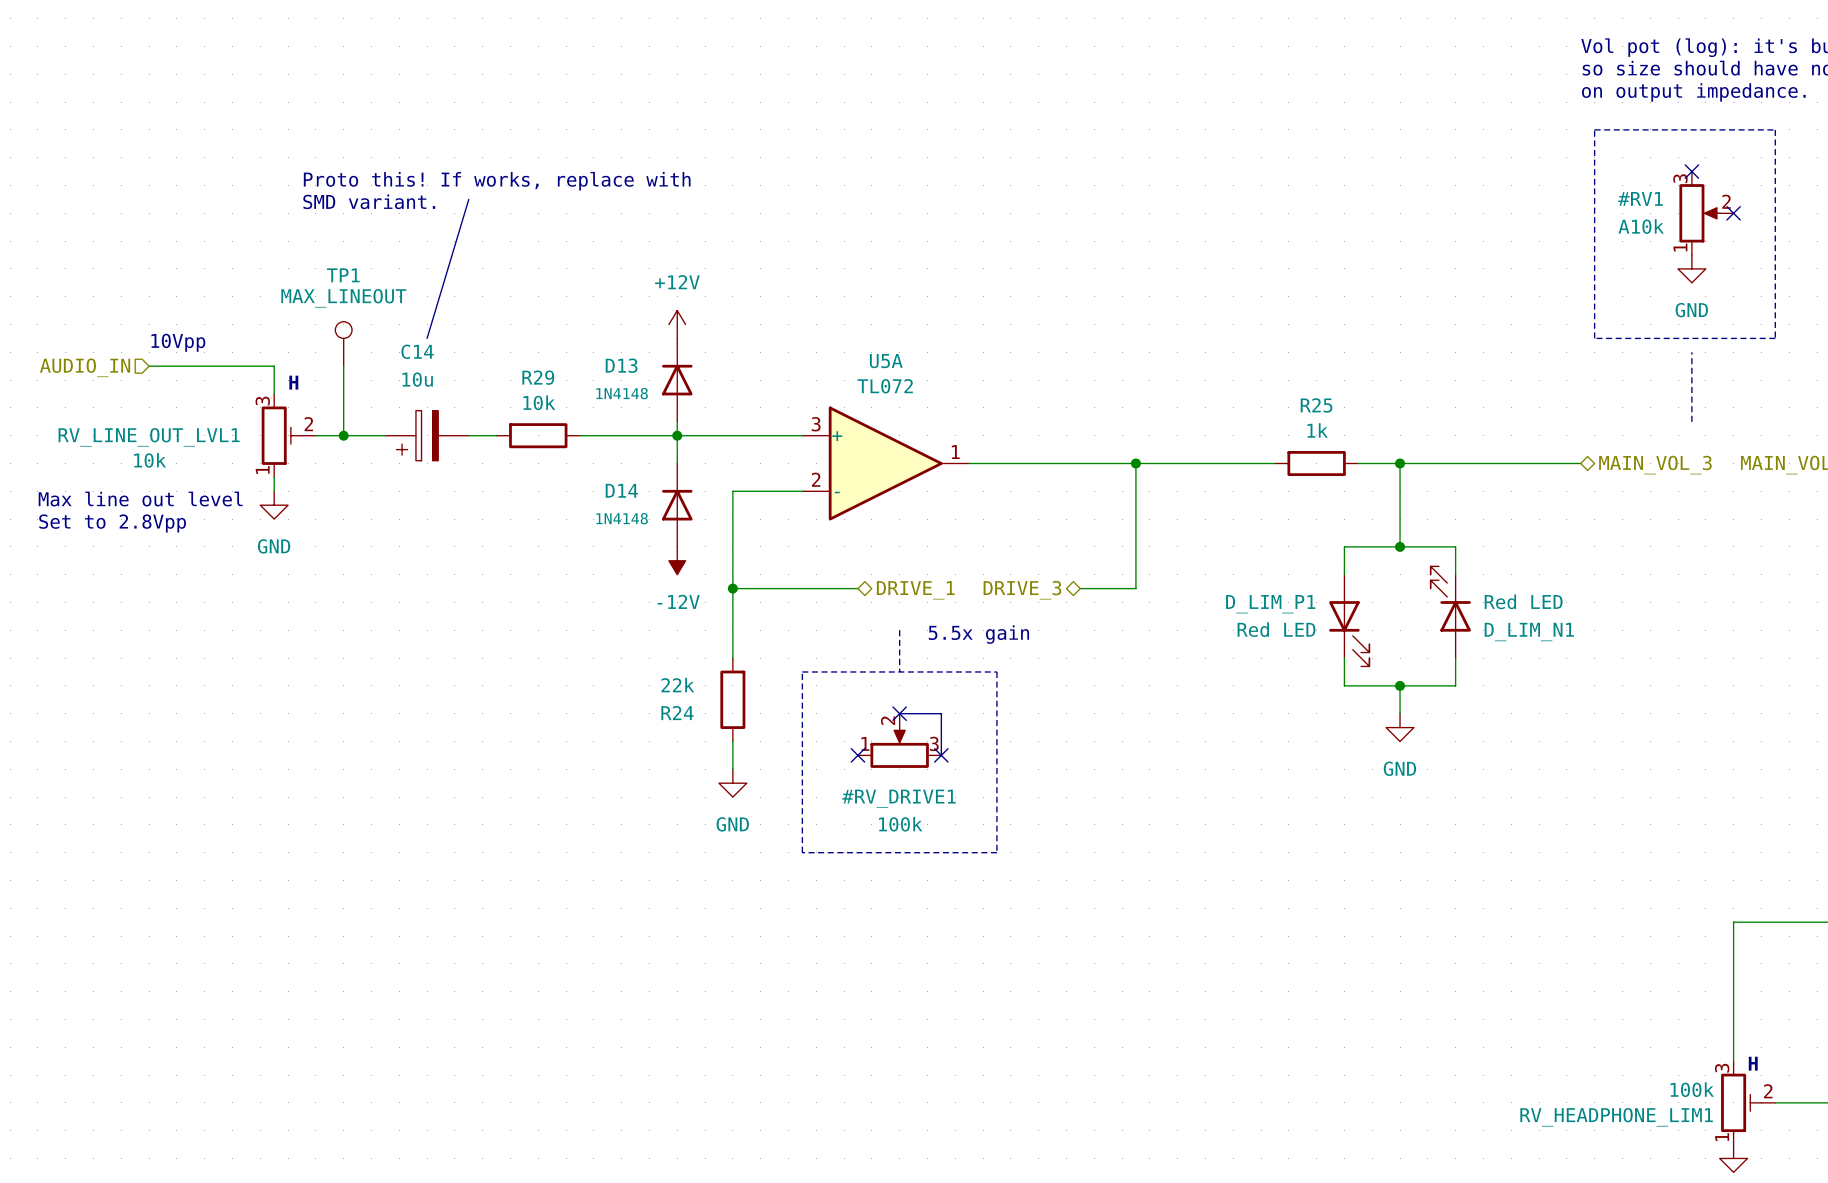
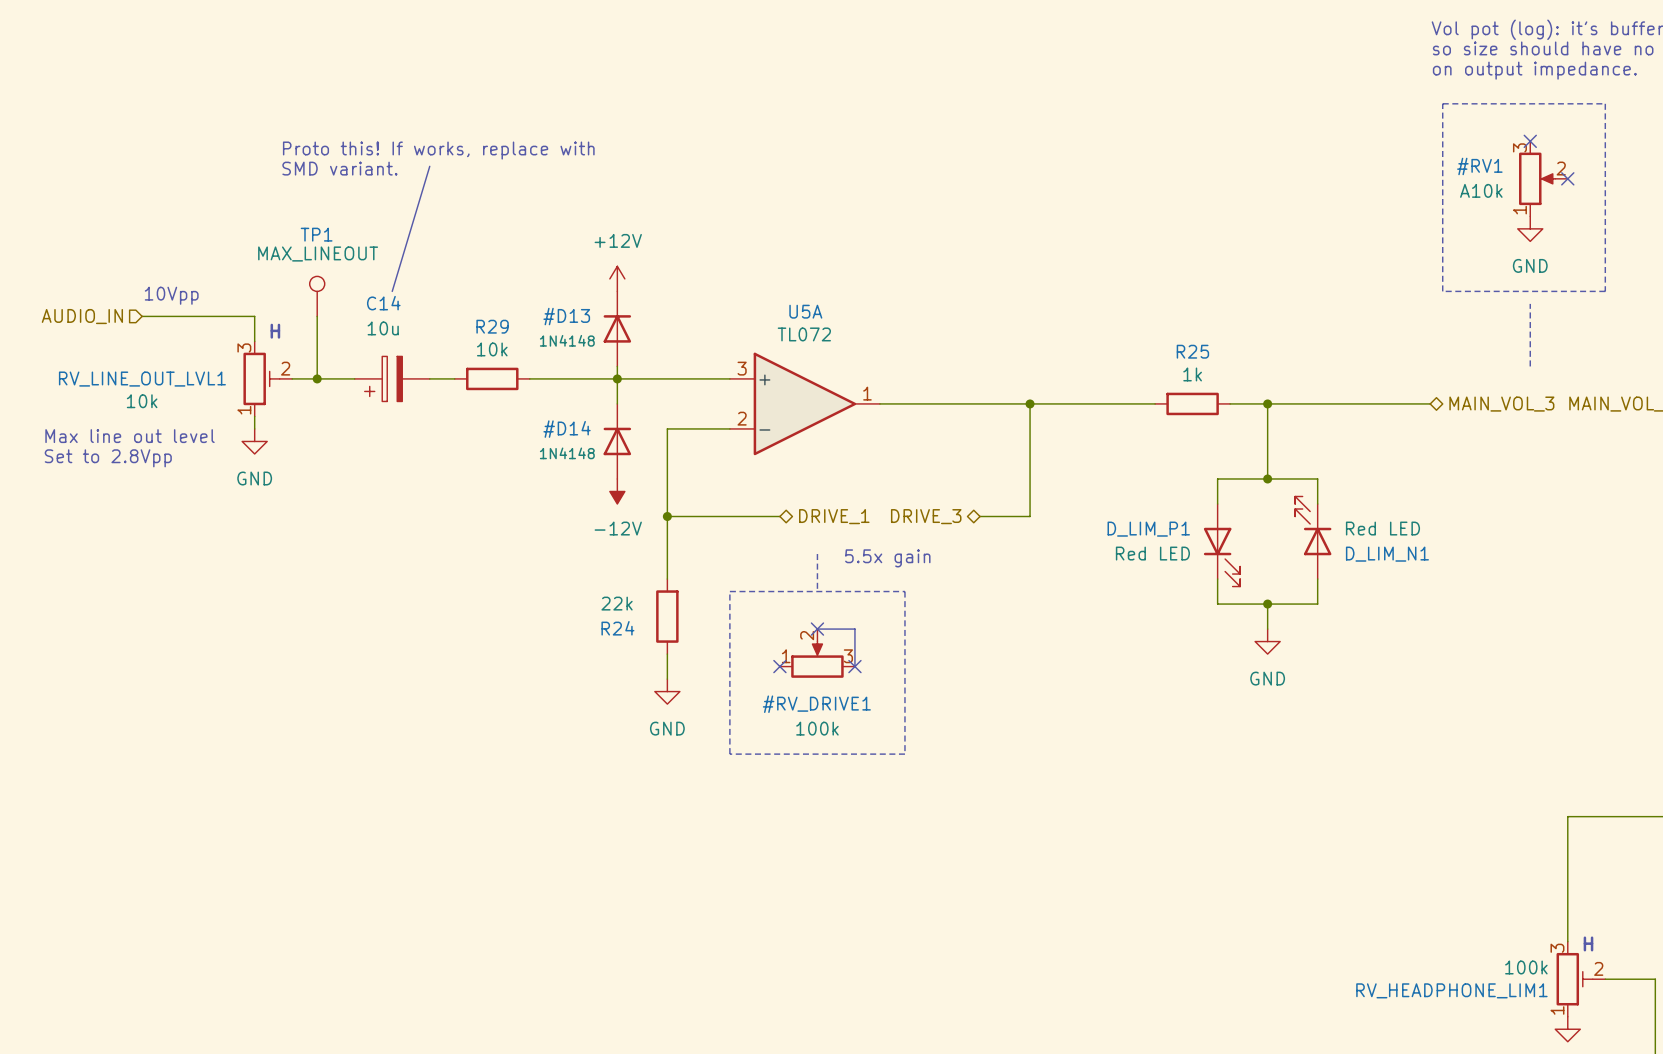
D13: 1N4148 (677, 380) -> none
#D13: none -> 1N4148 (617, 328)
D14: 1N4148 (677, 505) -> none
#D14: none -> 1N4148 (617, 441)

